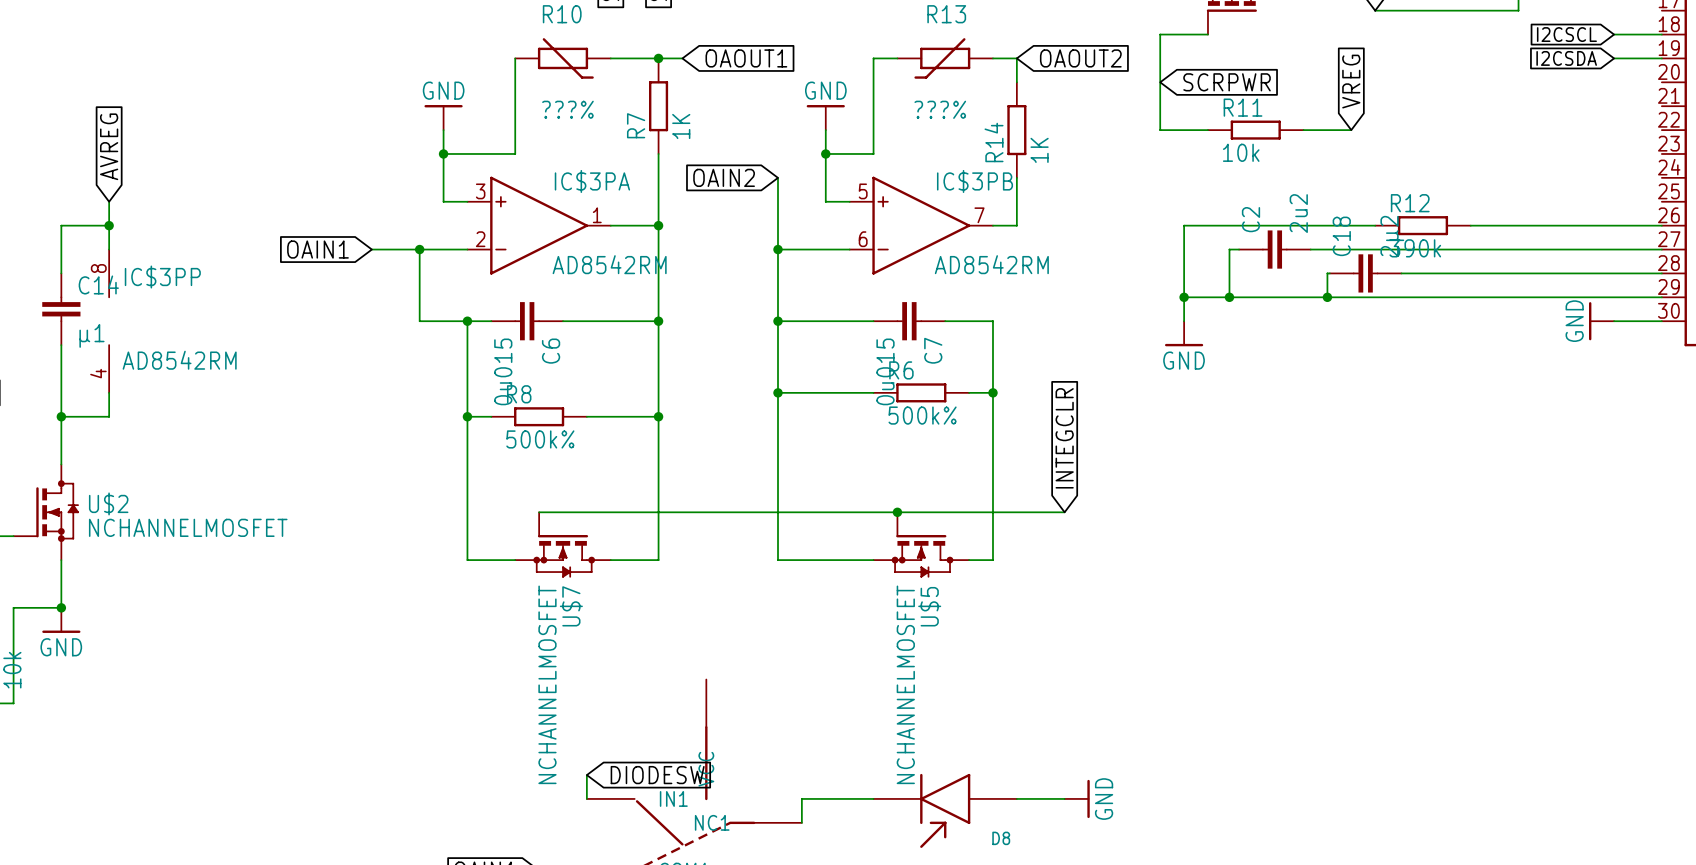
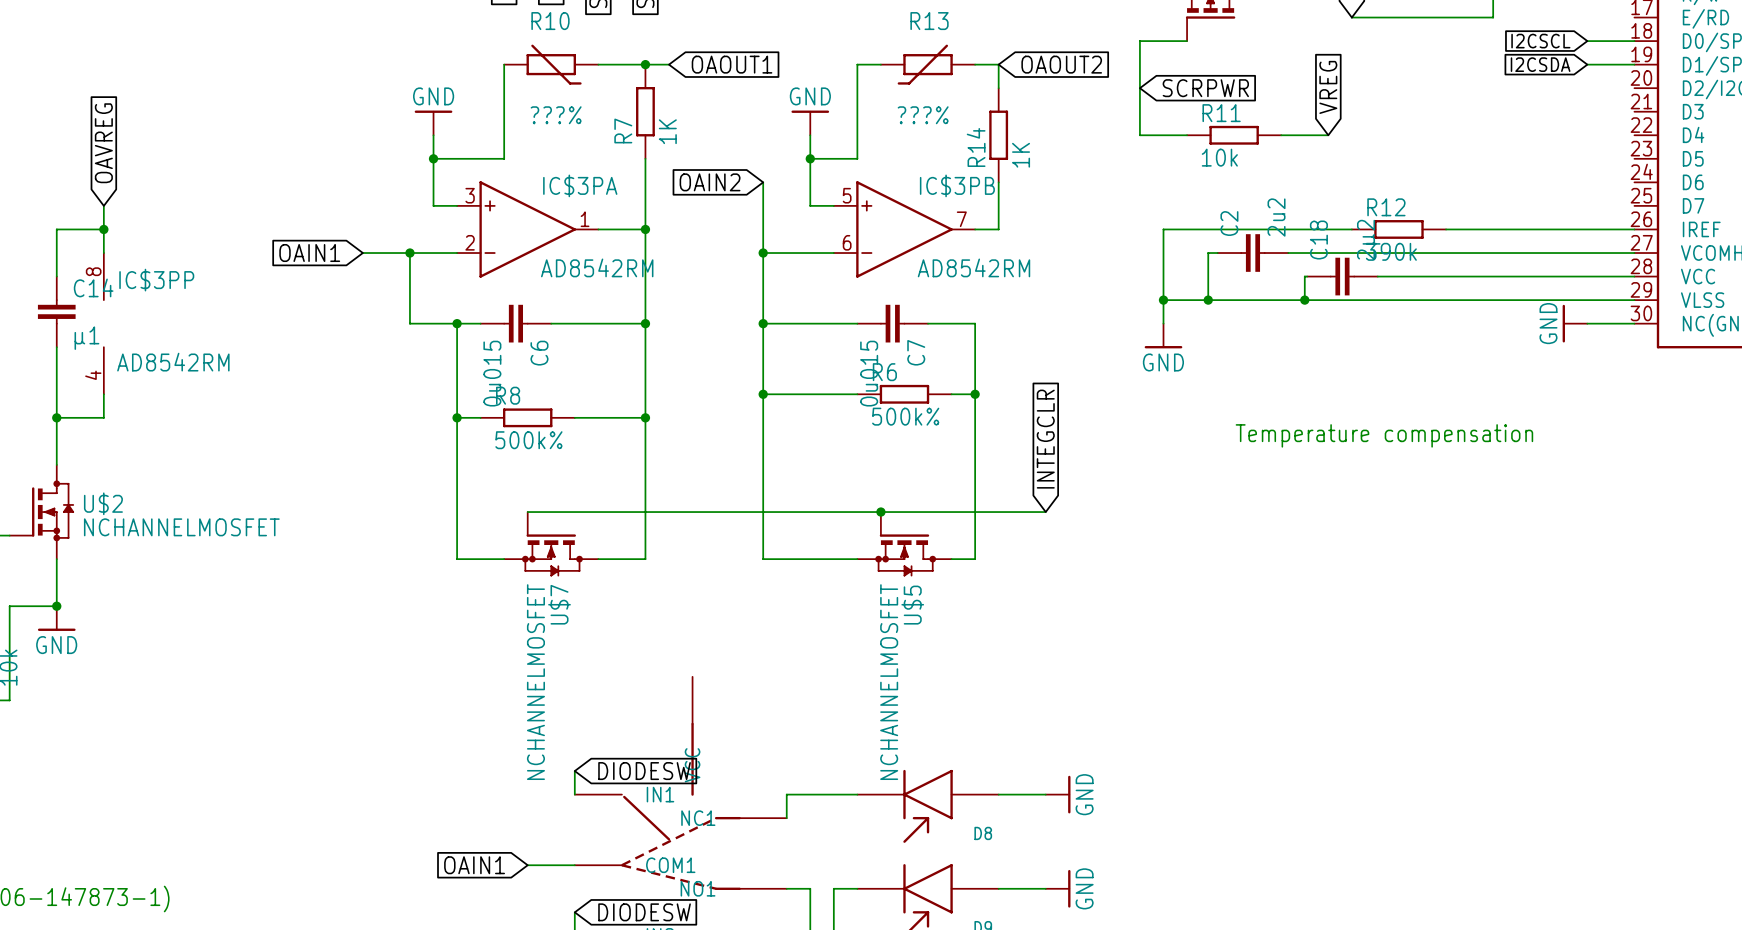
global label: AVREG (109, 146) -> OAVREG (103, 143)
text: none -> Temperature compensation (1384, 435)

